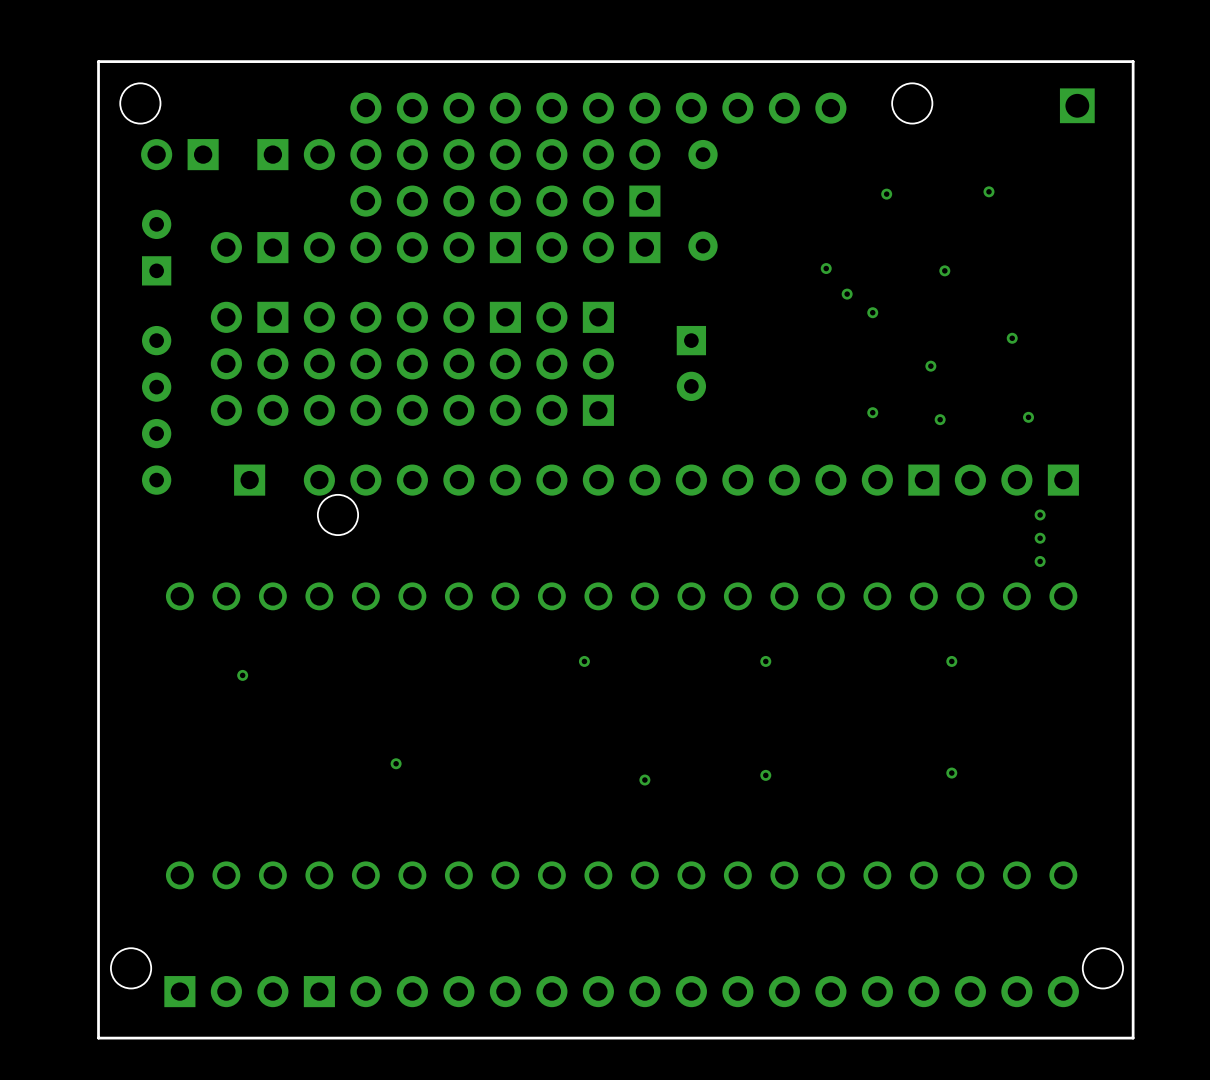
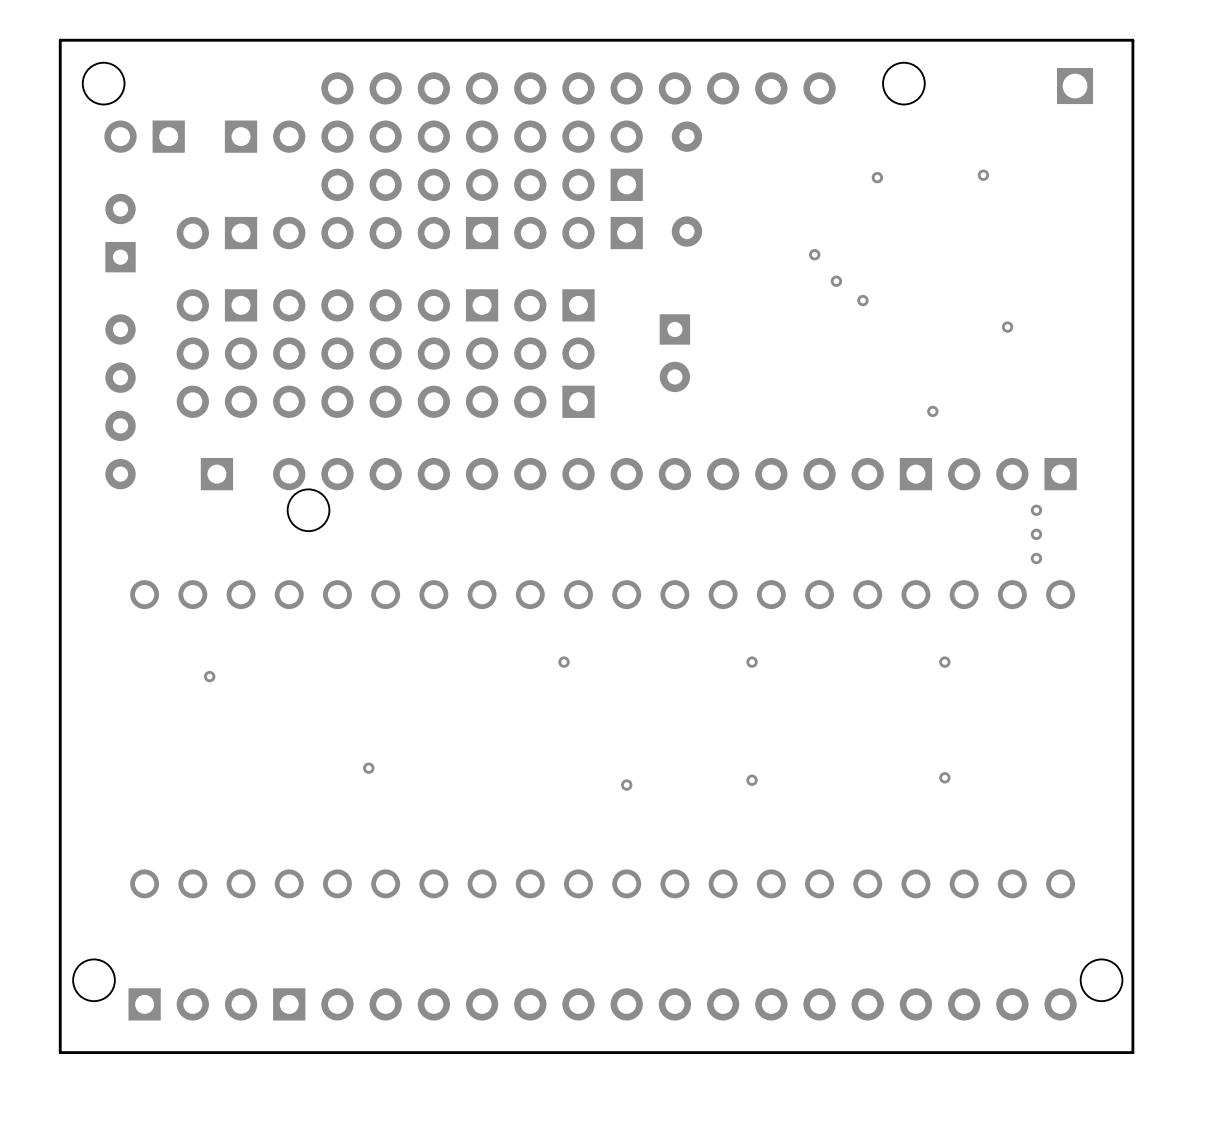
part: (944, 270) -> none
part: (930, 366) -> none
part: (872, 412) -> none
part: (1028, 417) -> none

